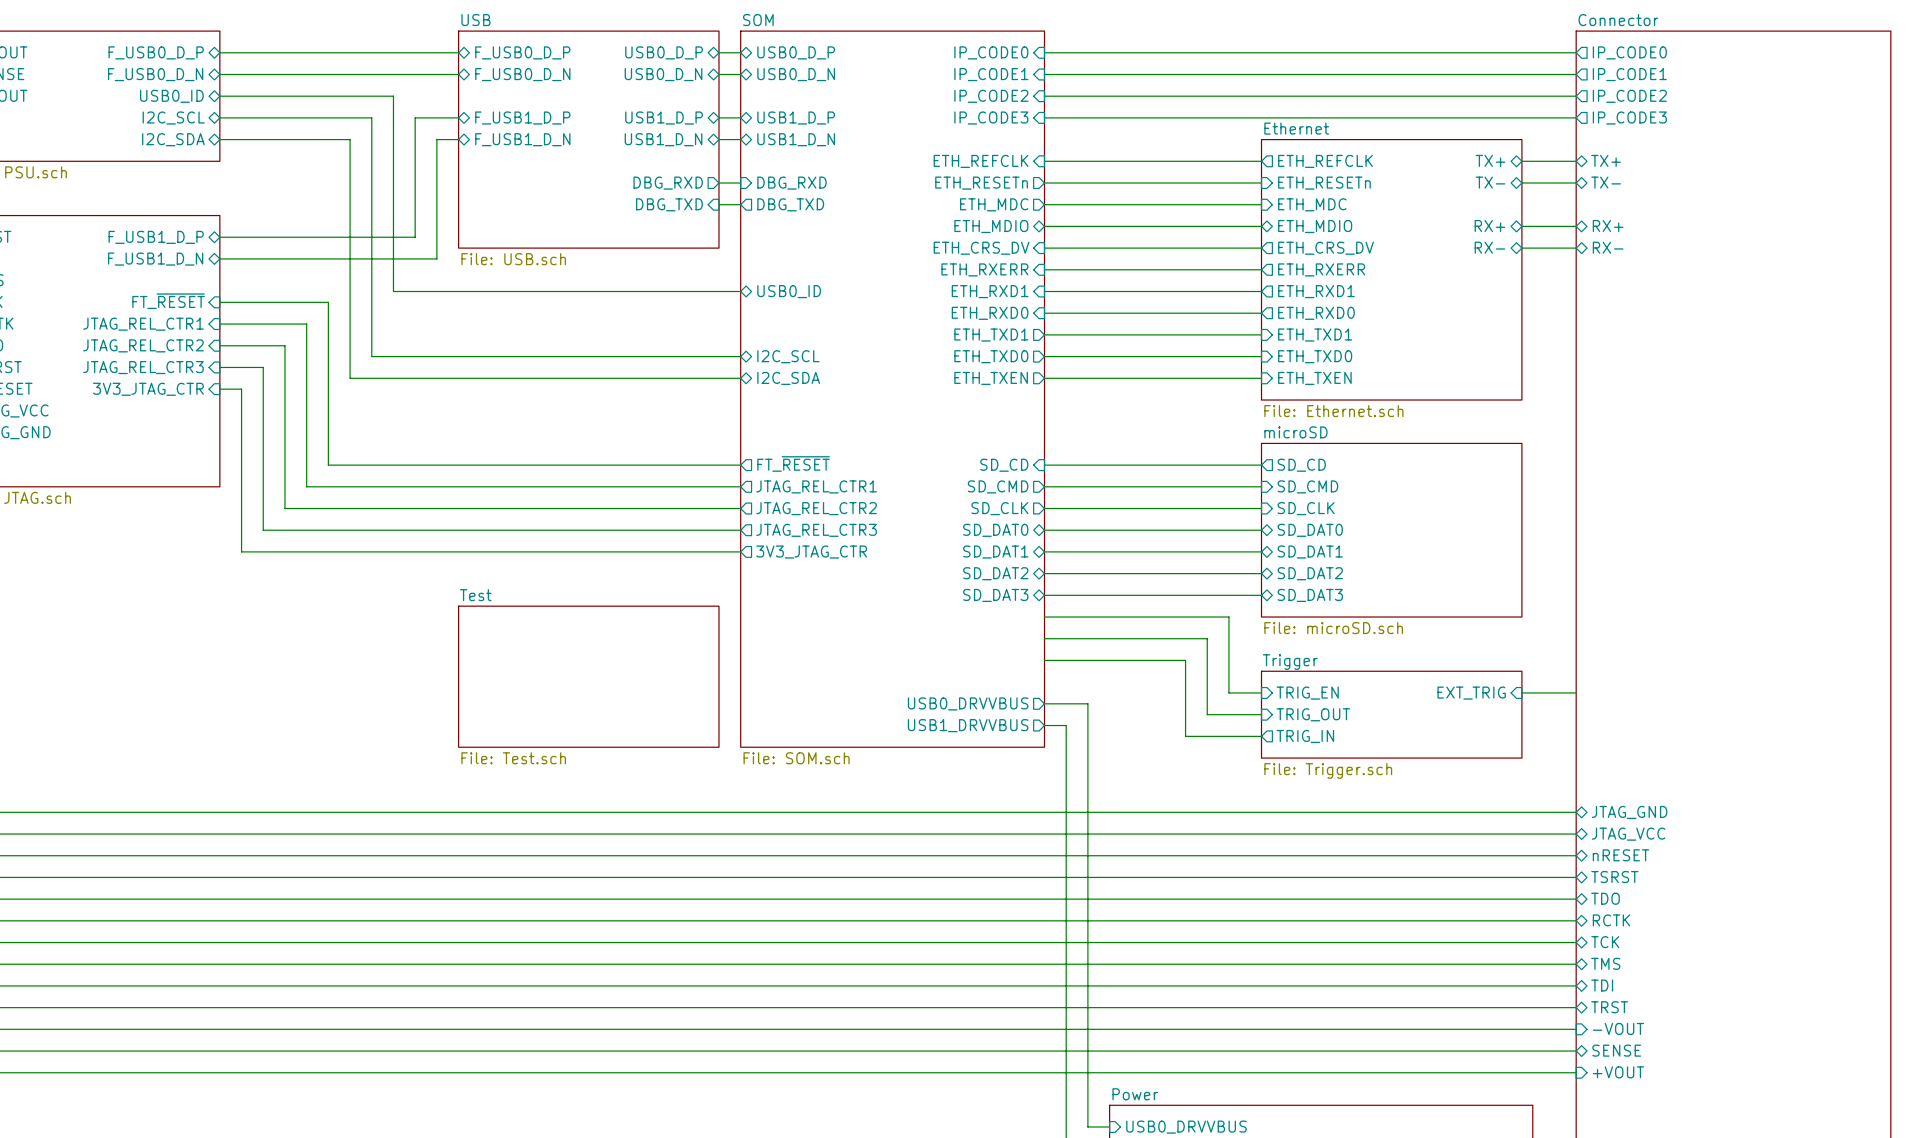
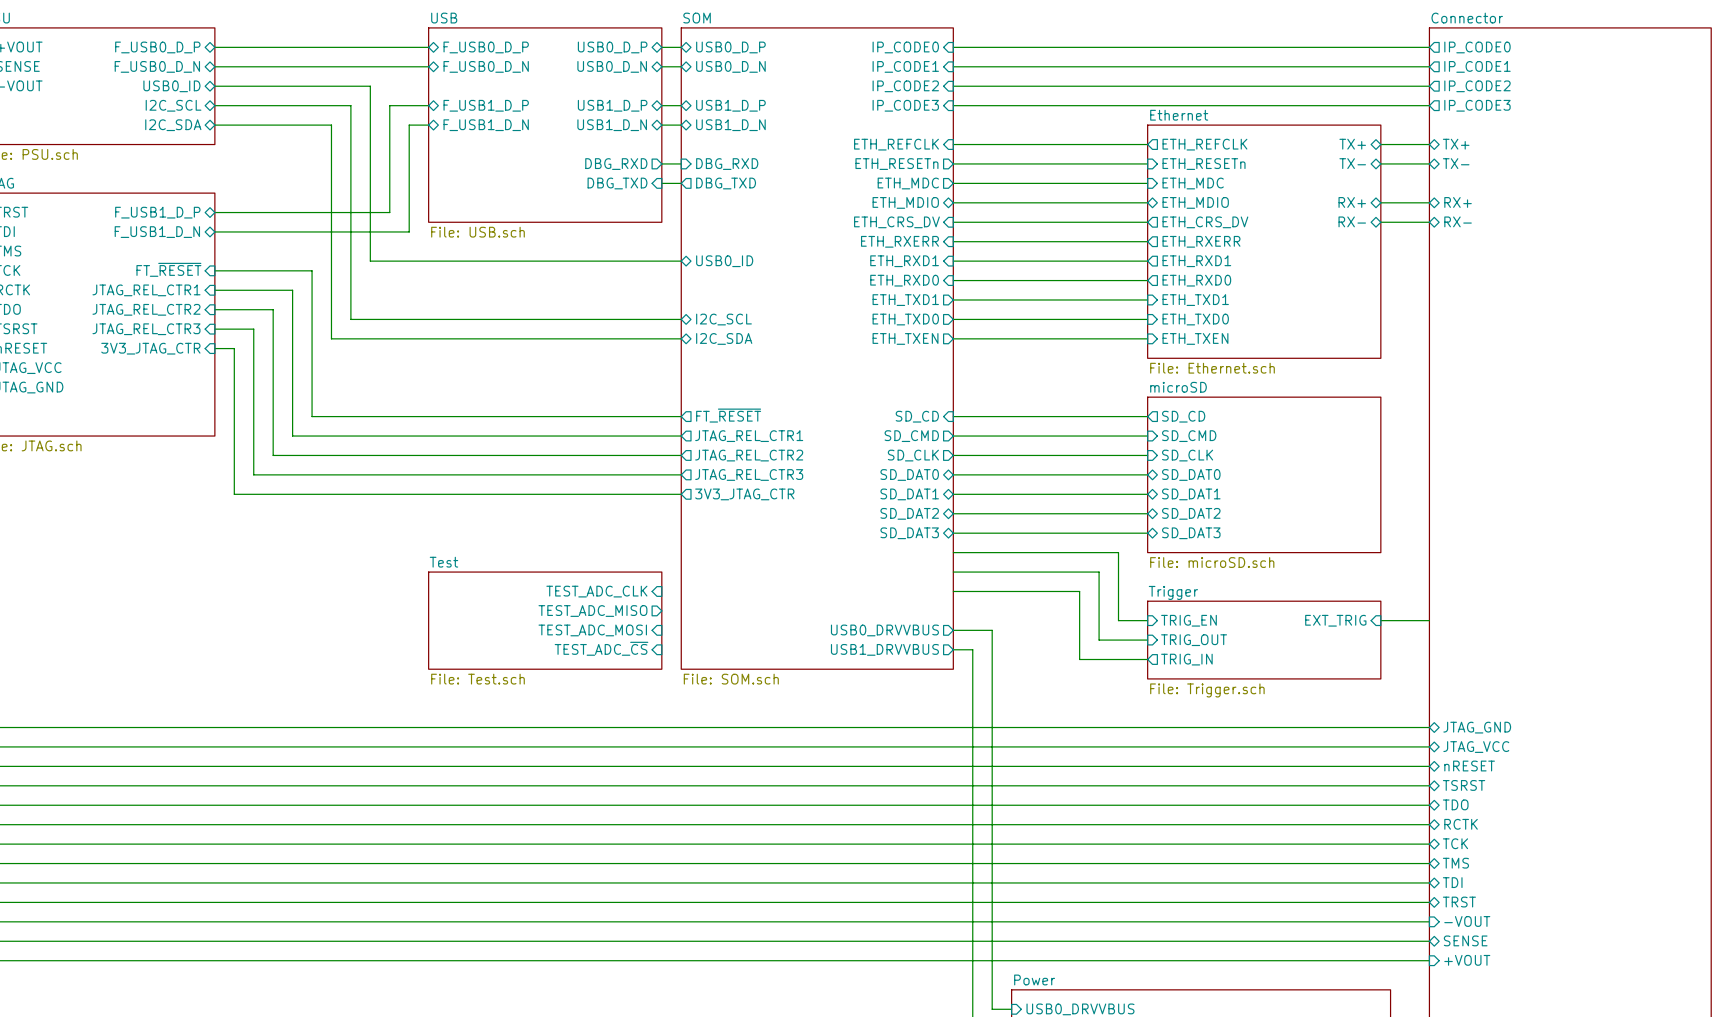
sheet pin: none -> TEST_ADC_CLK (596, 591)
sheet Test: File: Test.sch (588, 676) -> none
sheet pin: none -> TEST_ADC_MISO (592, 611)
sheet Test: none -> File: Test.sch (545, 620)
sheet pin: none -> TEST_ADC_MOSI (592, 630)
sheet pin: none -> TEST_ADC_~{CS} (601, 648)

